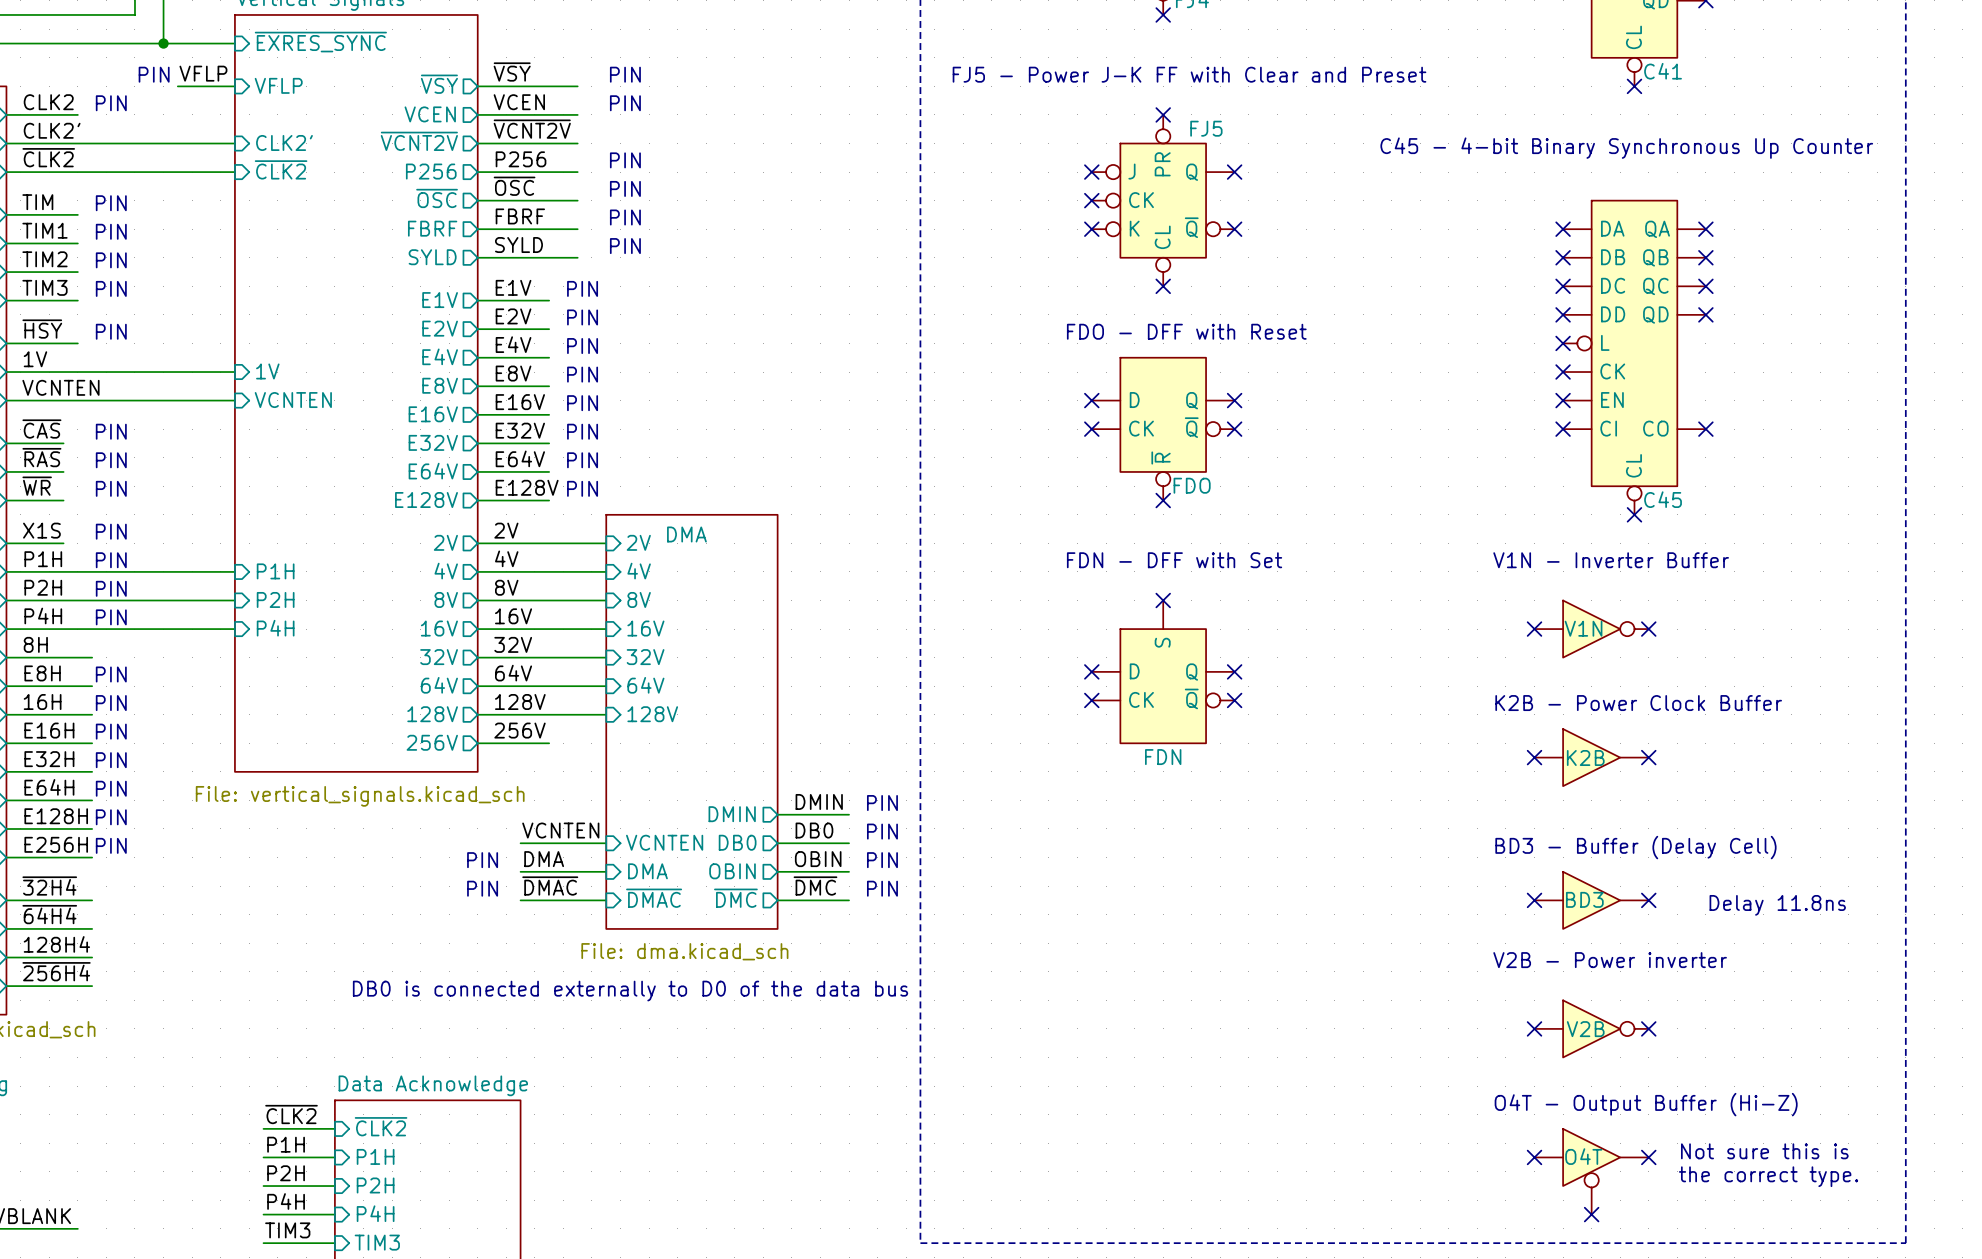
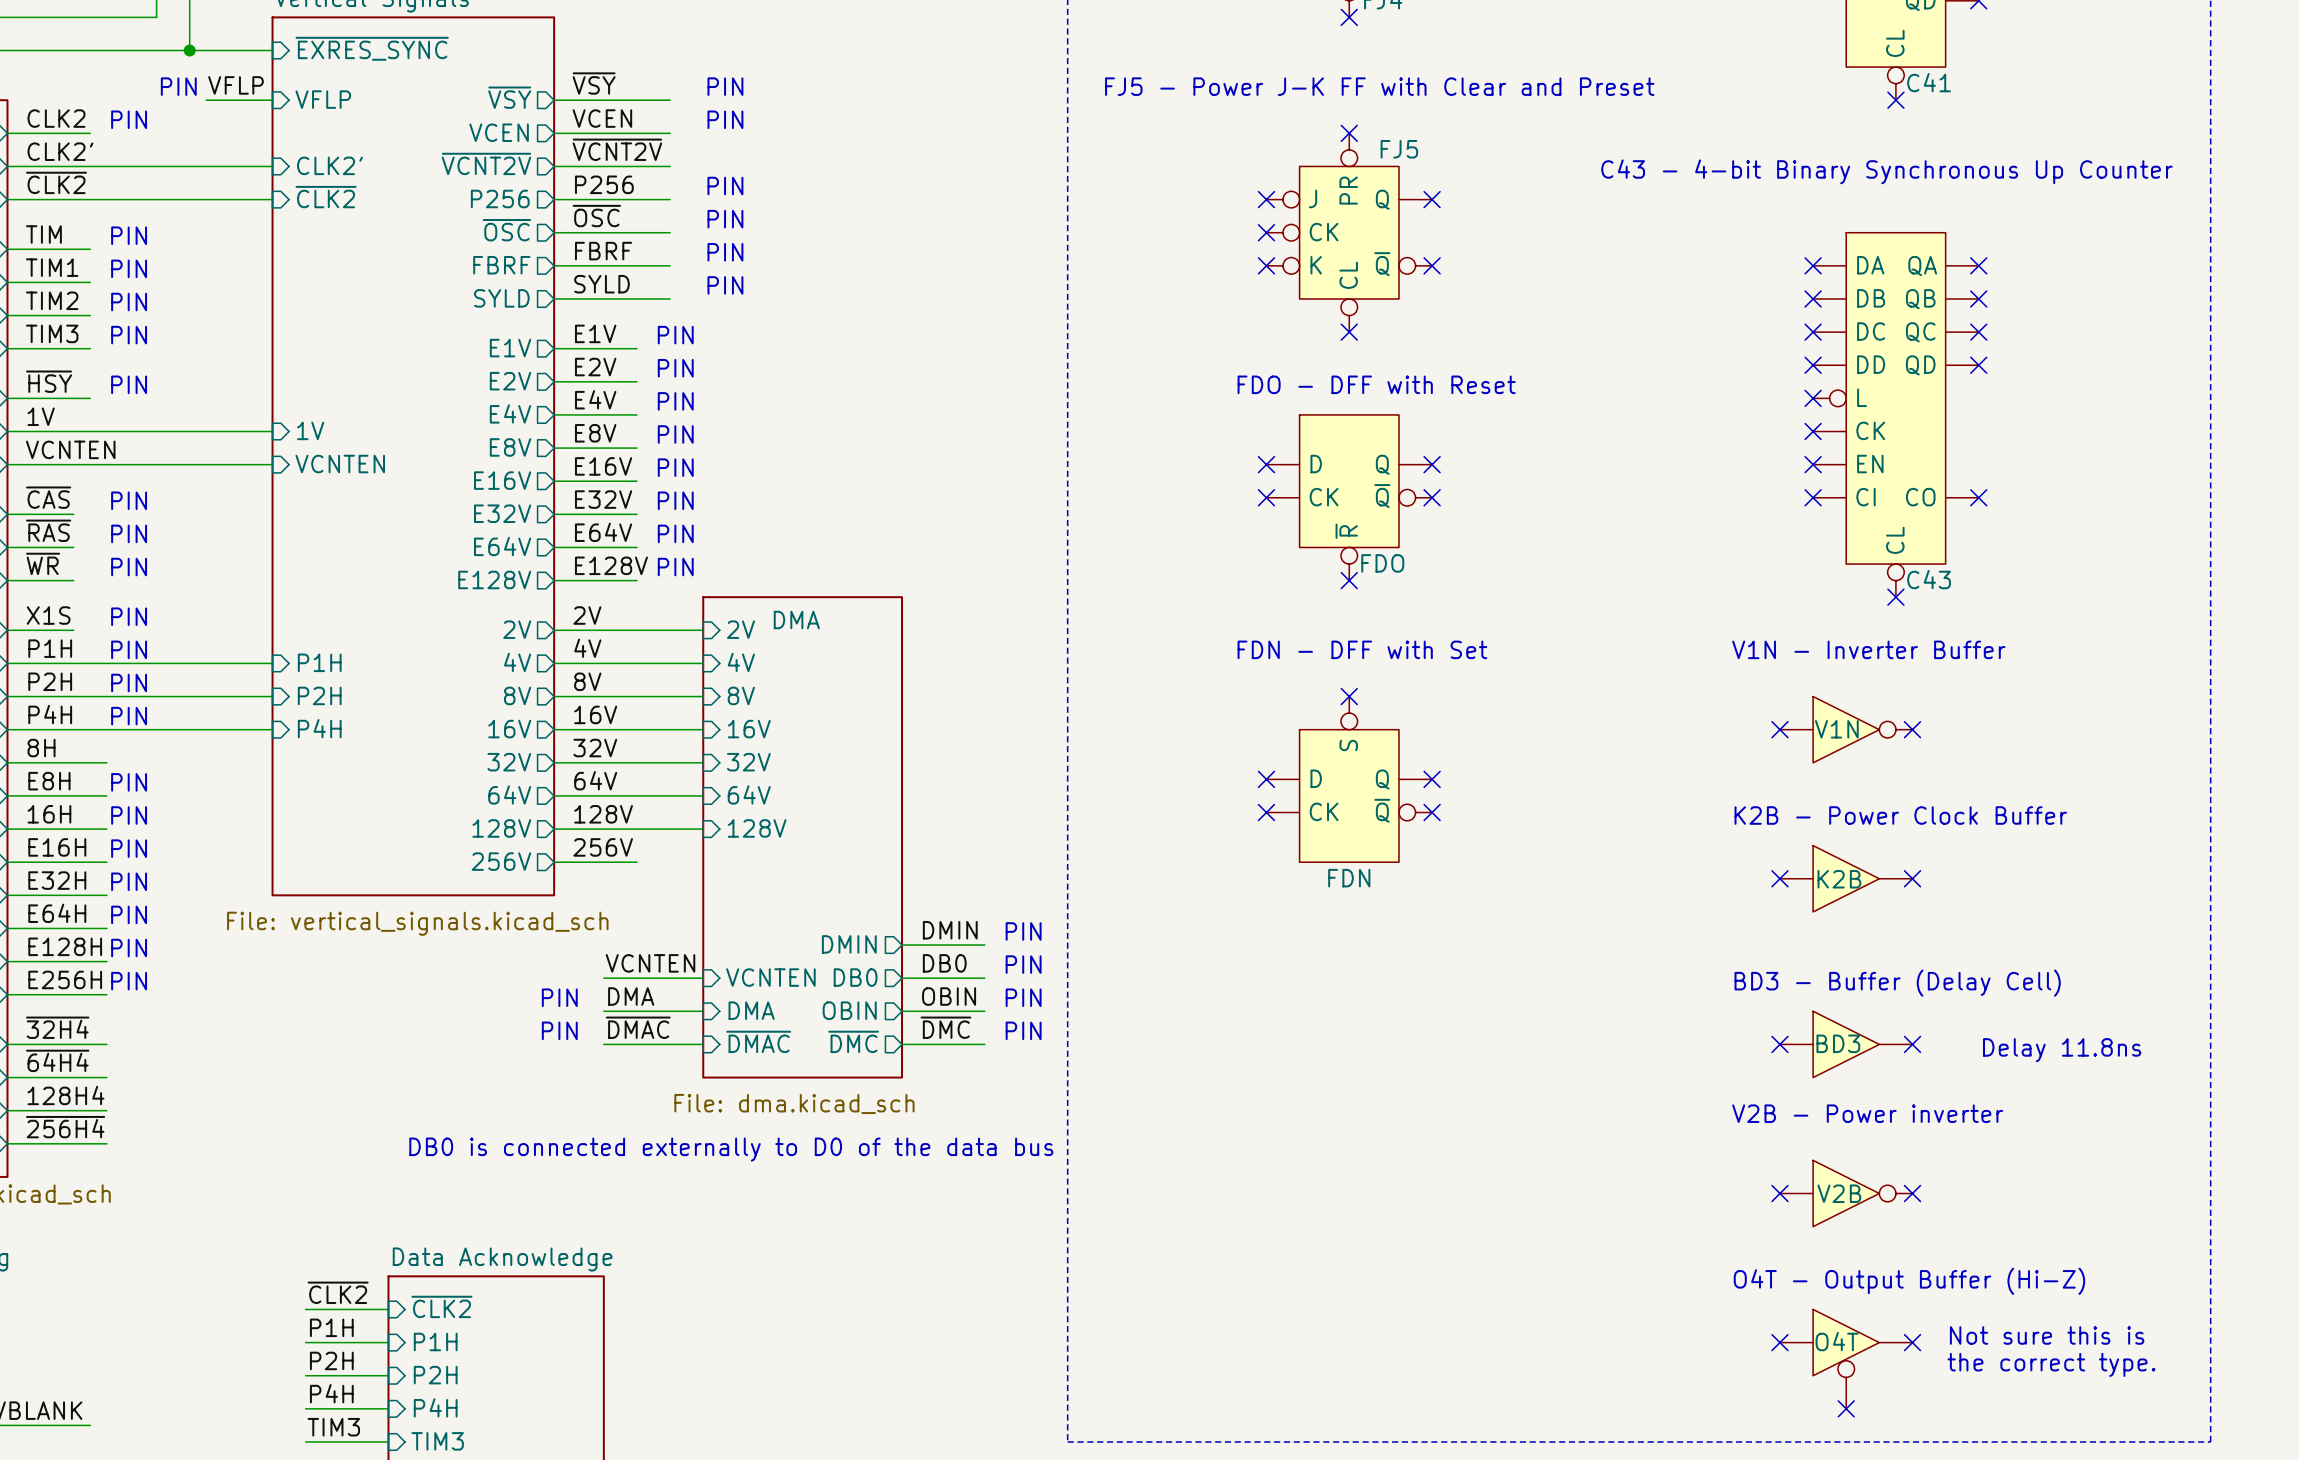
text: C45 - 4-bit Binary Synchronous Up Counter (1626, 148) -> C43 - 4-bit Binary Synchronous Up Counter (1886, 171)
part value: C45 (1663, 499) -> C43 (1929, 579)
part symbol: [1091, 600, 1235, 744] -> [1266, 696, 1433, 863]

